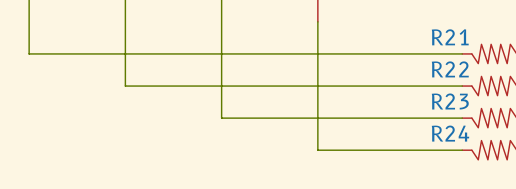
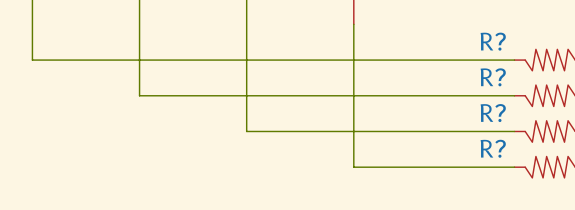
R21 name: R21 (450, 37) -> R? (493, 41)
R22 name: R22 (450, 69) -> R? (493, 77)
R23 name: R23 (450, 101) -> R? (493, 113)
R24 name: R24 (450, 133) -> R? (493, 148)

